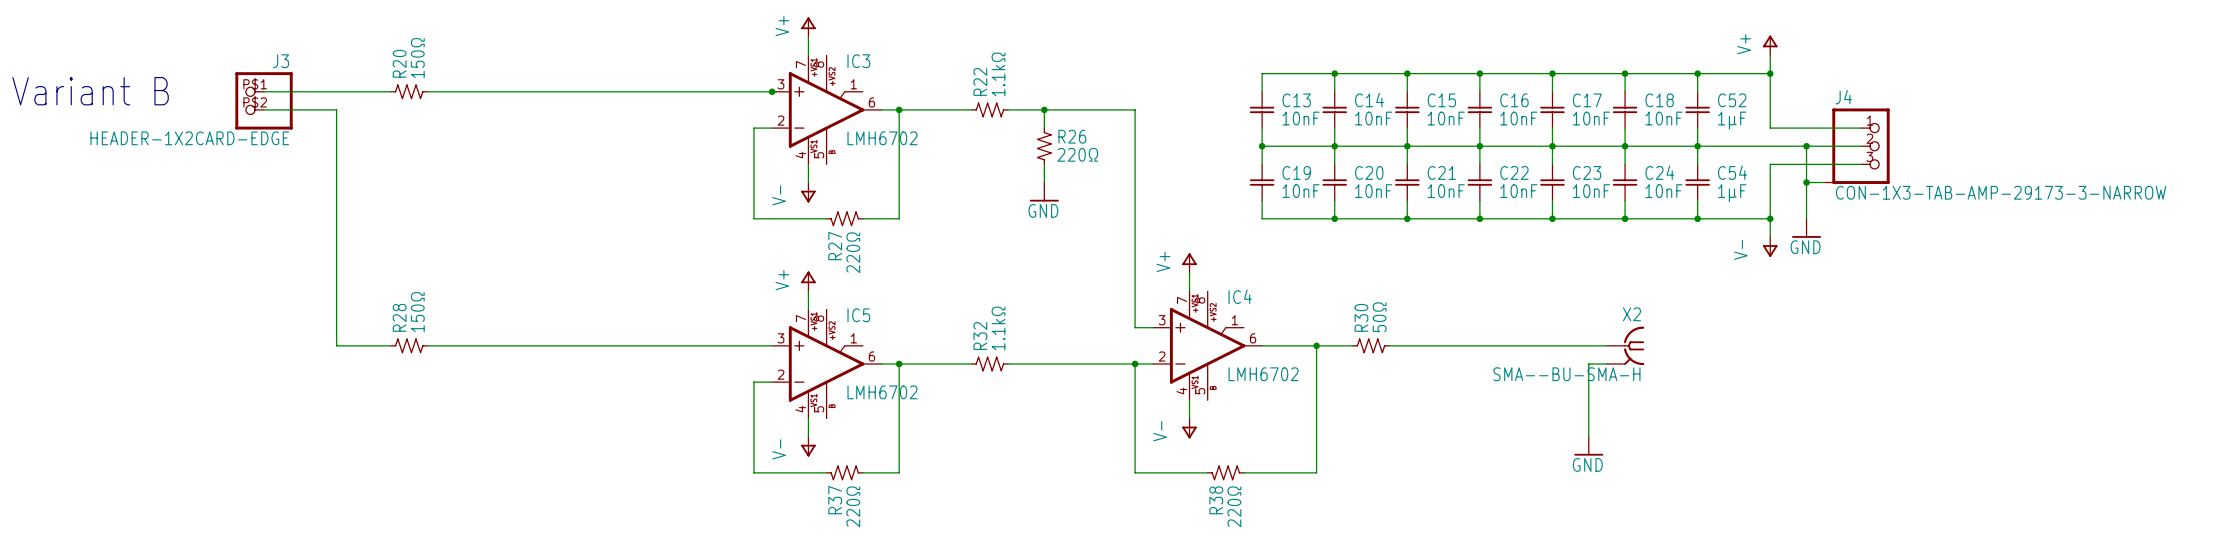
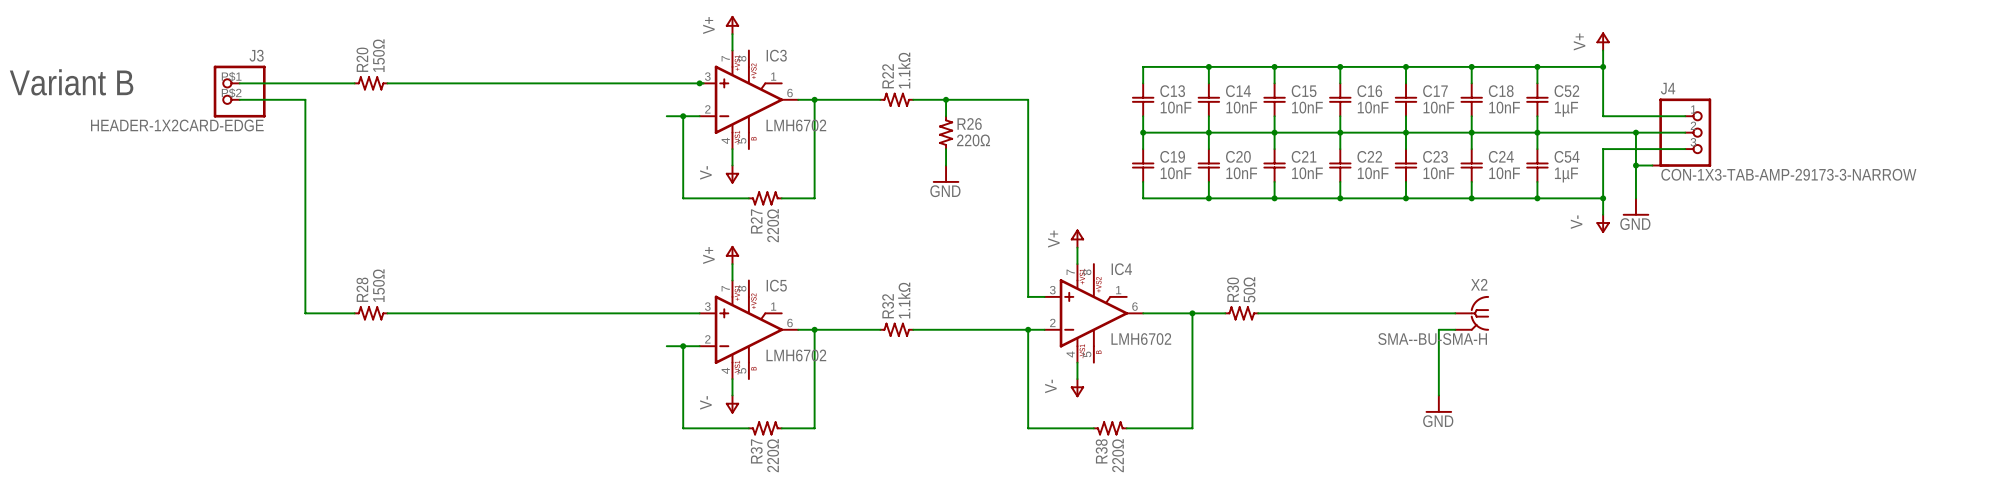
wire: none -> (666, 116) (683, 116)
junction: none -> (683, 116)
wire: none -> (666, 346) (683, 346)
junction: none -> (683, 346)

